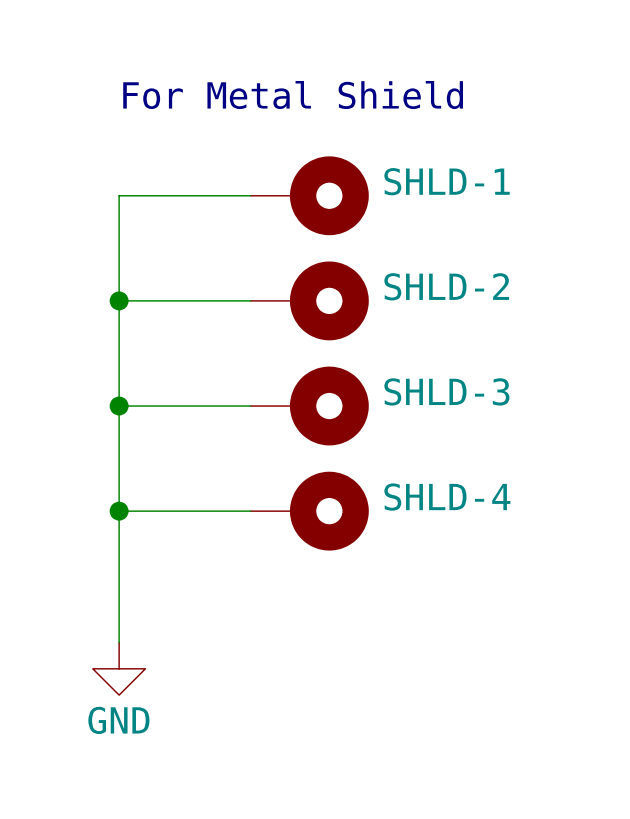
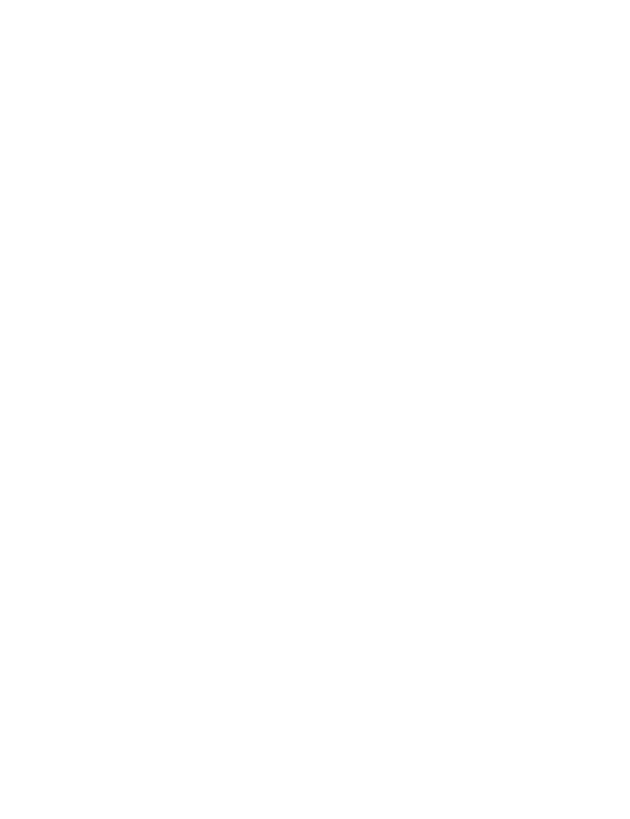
text: For Metal Shield (293, 95) -> none
wire: (250, 195) (119, 195) (119, 642) -> none
SHLD-1: (309, 195) -> none
wire: (119, 300) (250, 300) -> none
junction: (119, 300) -> none
SHLD-2: (309, 300) -> none
wire: (119, 406) (250, 406) -> none
junction: (119, 406) -> none
SHLD-3: (309, 406) -> none
wire: (119, 511) (250, 511) -> none
junction: (119, 511) -> none
SHLD-4: (309, 511) -> none
power symbol: GND (119, 668) -> none

